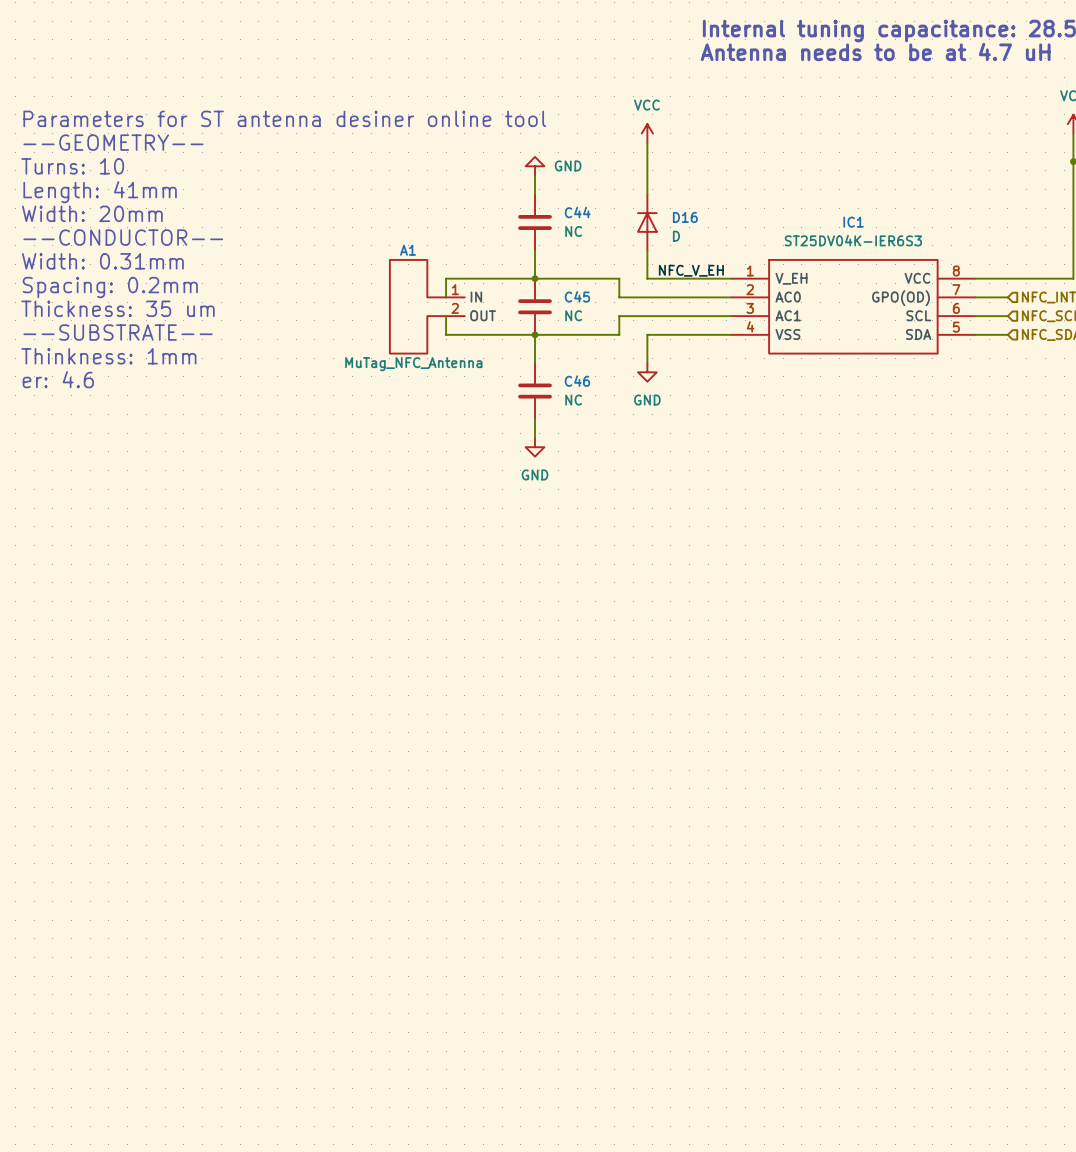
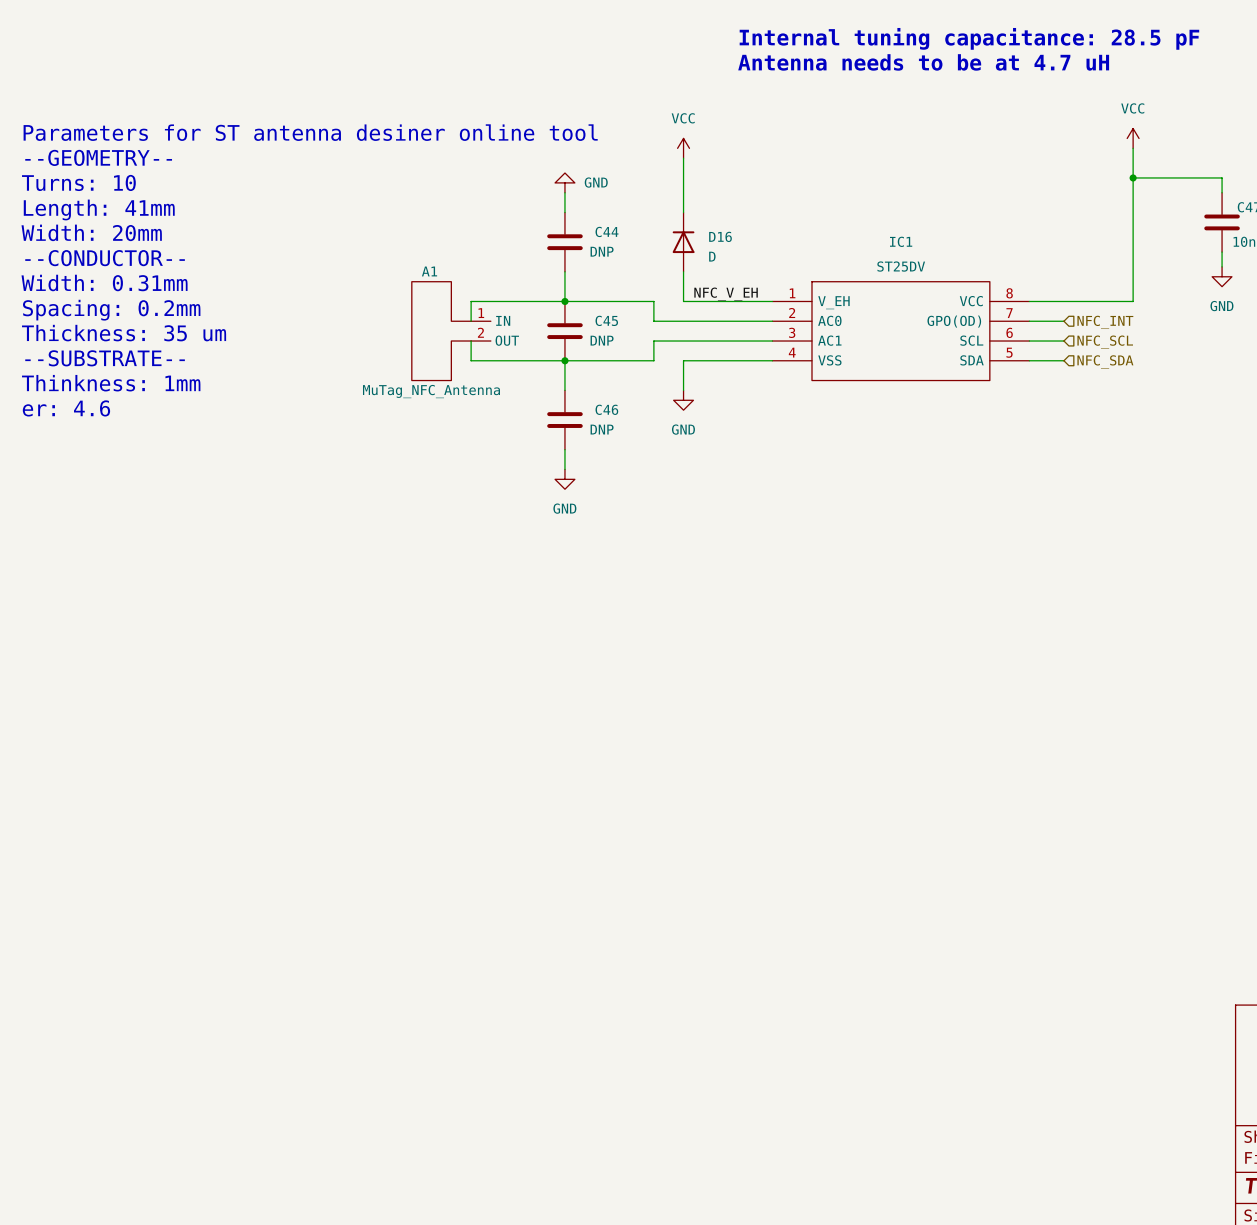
C44 value: NC (573, 231) -> DNP (602, 251)
IC1 value: ST25DV04K-IER6S3 (853, 240) -> ST25DV (901, 266)
C45 value: NC (573, 315) -> DNP (602, 340)
C46 value: NC (573, 400) -> DNP (602, 429)

